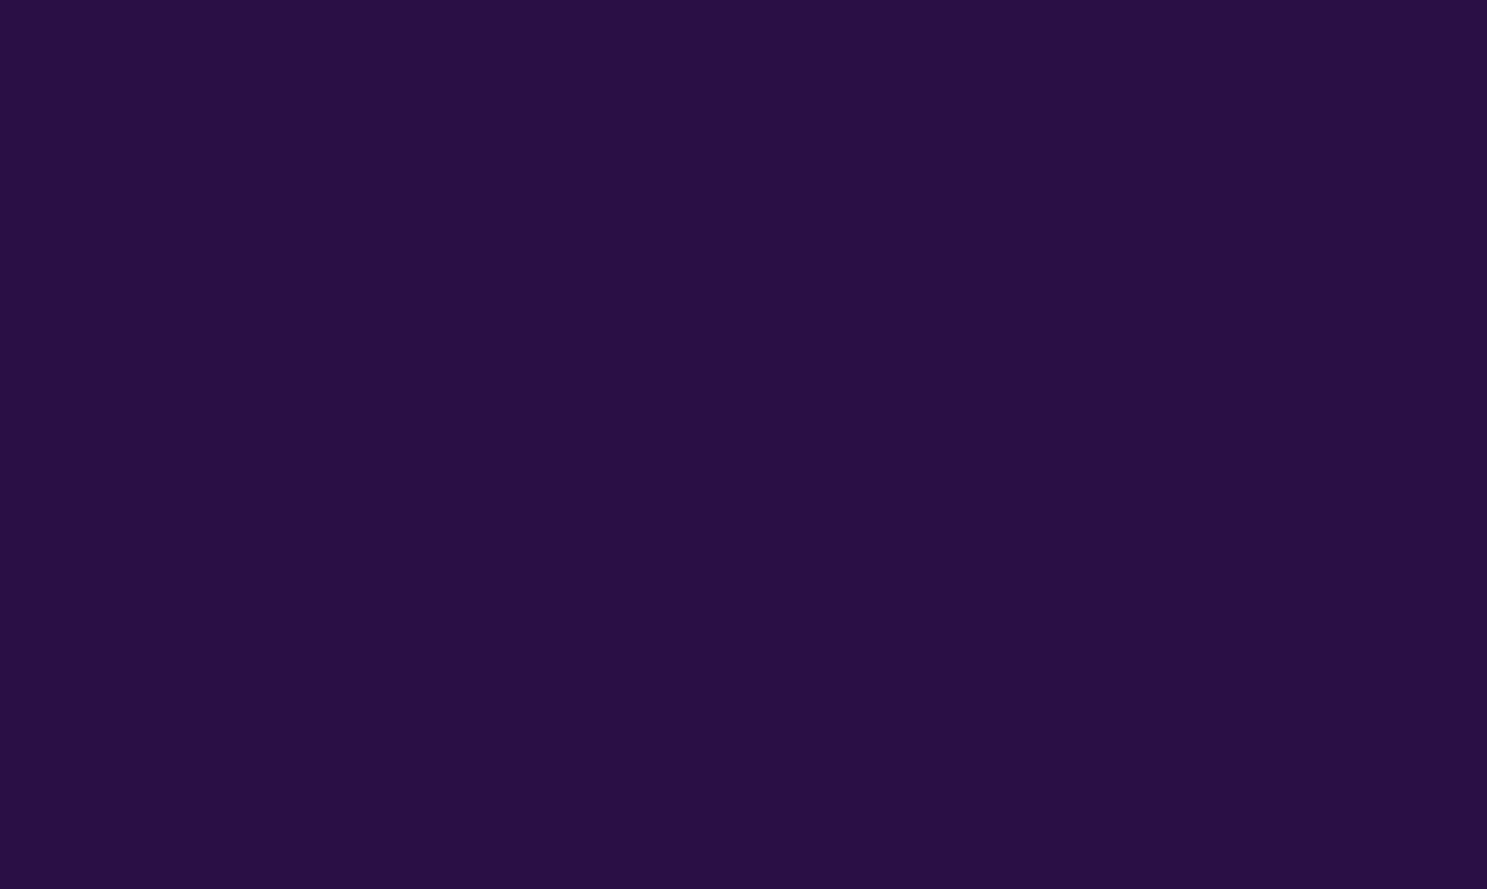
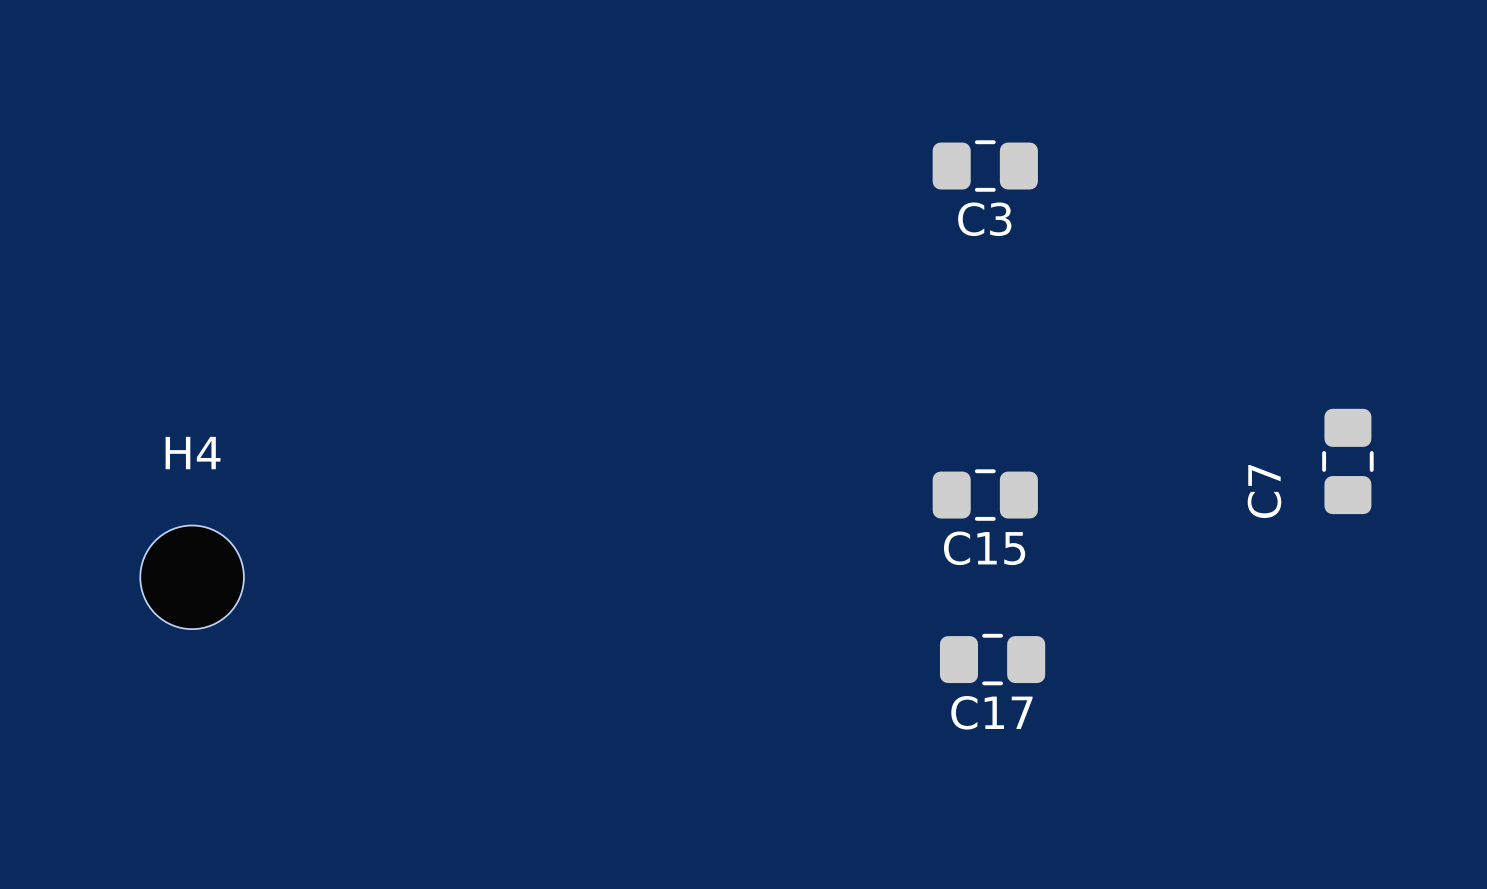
C3: none -> (985, 166)
C7: none -> (1347, 461)
C15: none -> (985, 495)
H4: none -> (192, 577)
C17: none -> (992, 659)

